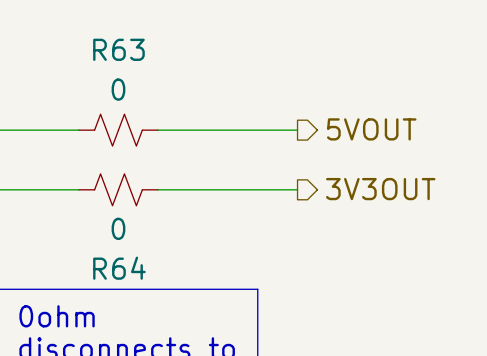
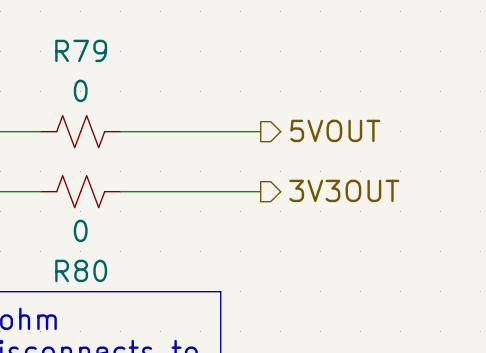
R63 name: R63 (118, 49) -> R79 (81, 50)
R64 name: R64 (119, 268) -> R80 (81, 270)

